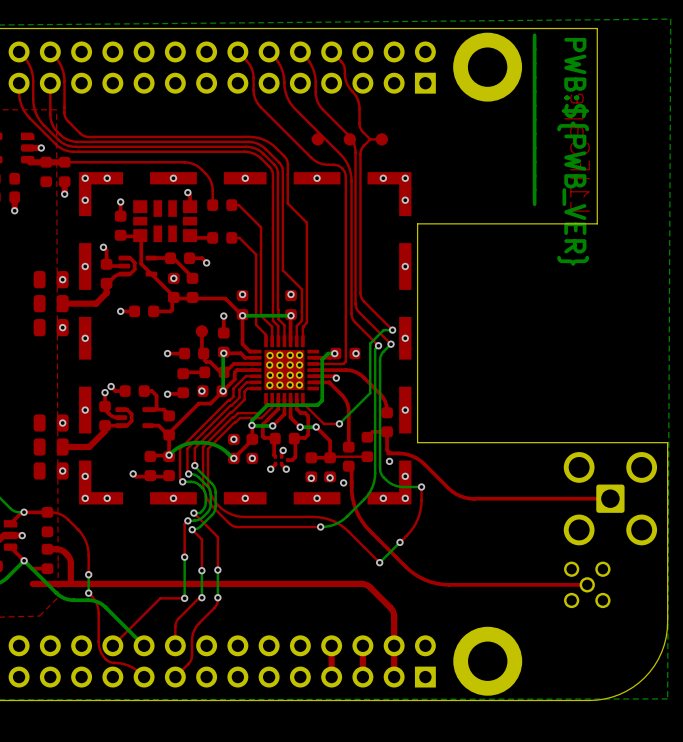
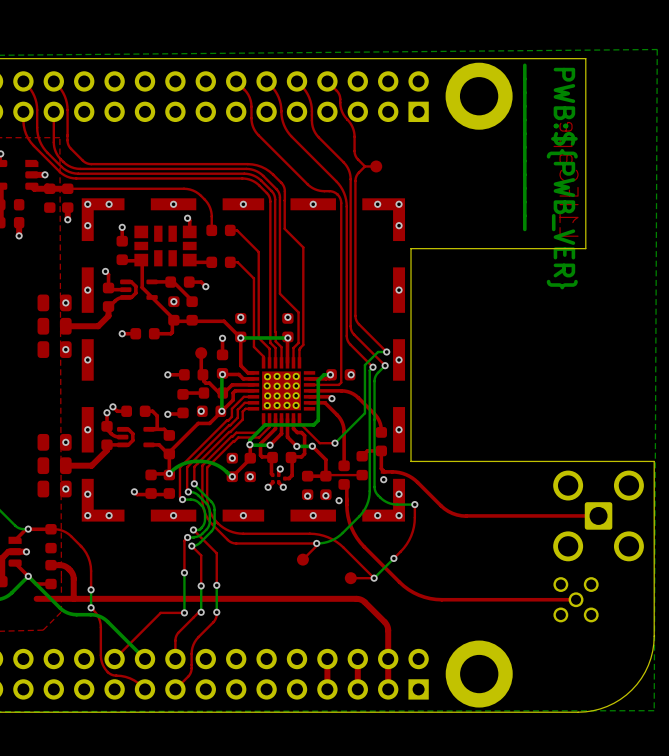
part: (317, 139) -> none
part: (349, 139) -> none
top track: none -> (316, 545) (302, 559)
part: none -> (302, 559)
part: none -> (350, 578)
top track: none -> (374, 578) (350, 578)

